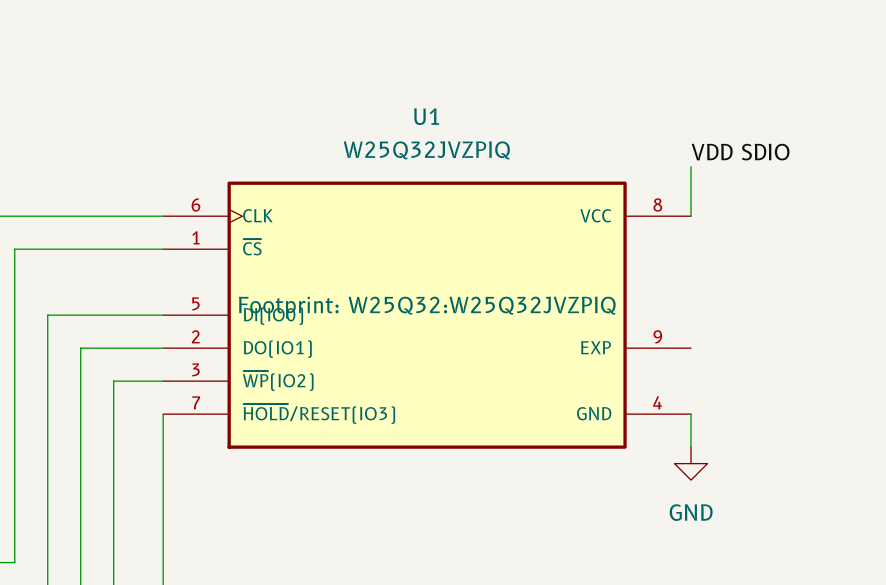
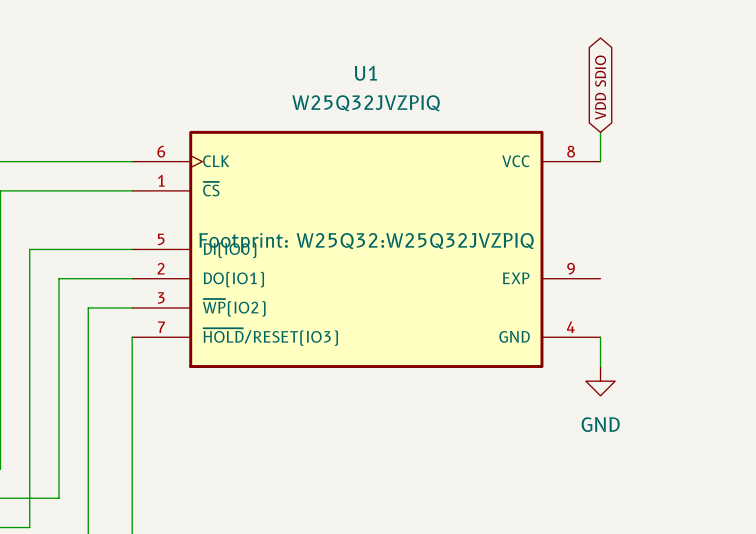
global label: none -> VDD SDIO (600, 87)
label: VDD SDIO (740, 152) -> none
wire: (691, 166) (691, 183) -> none

